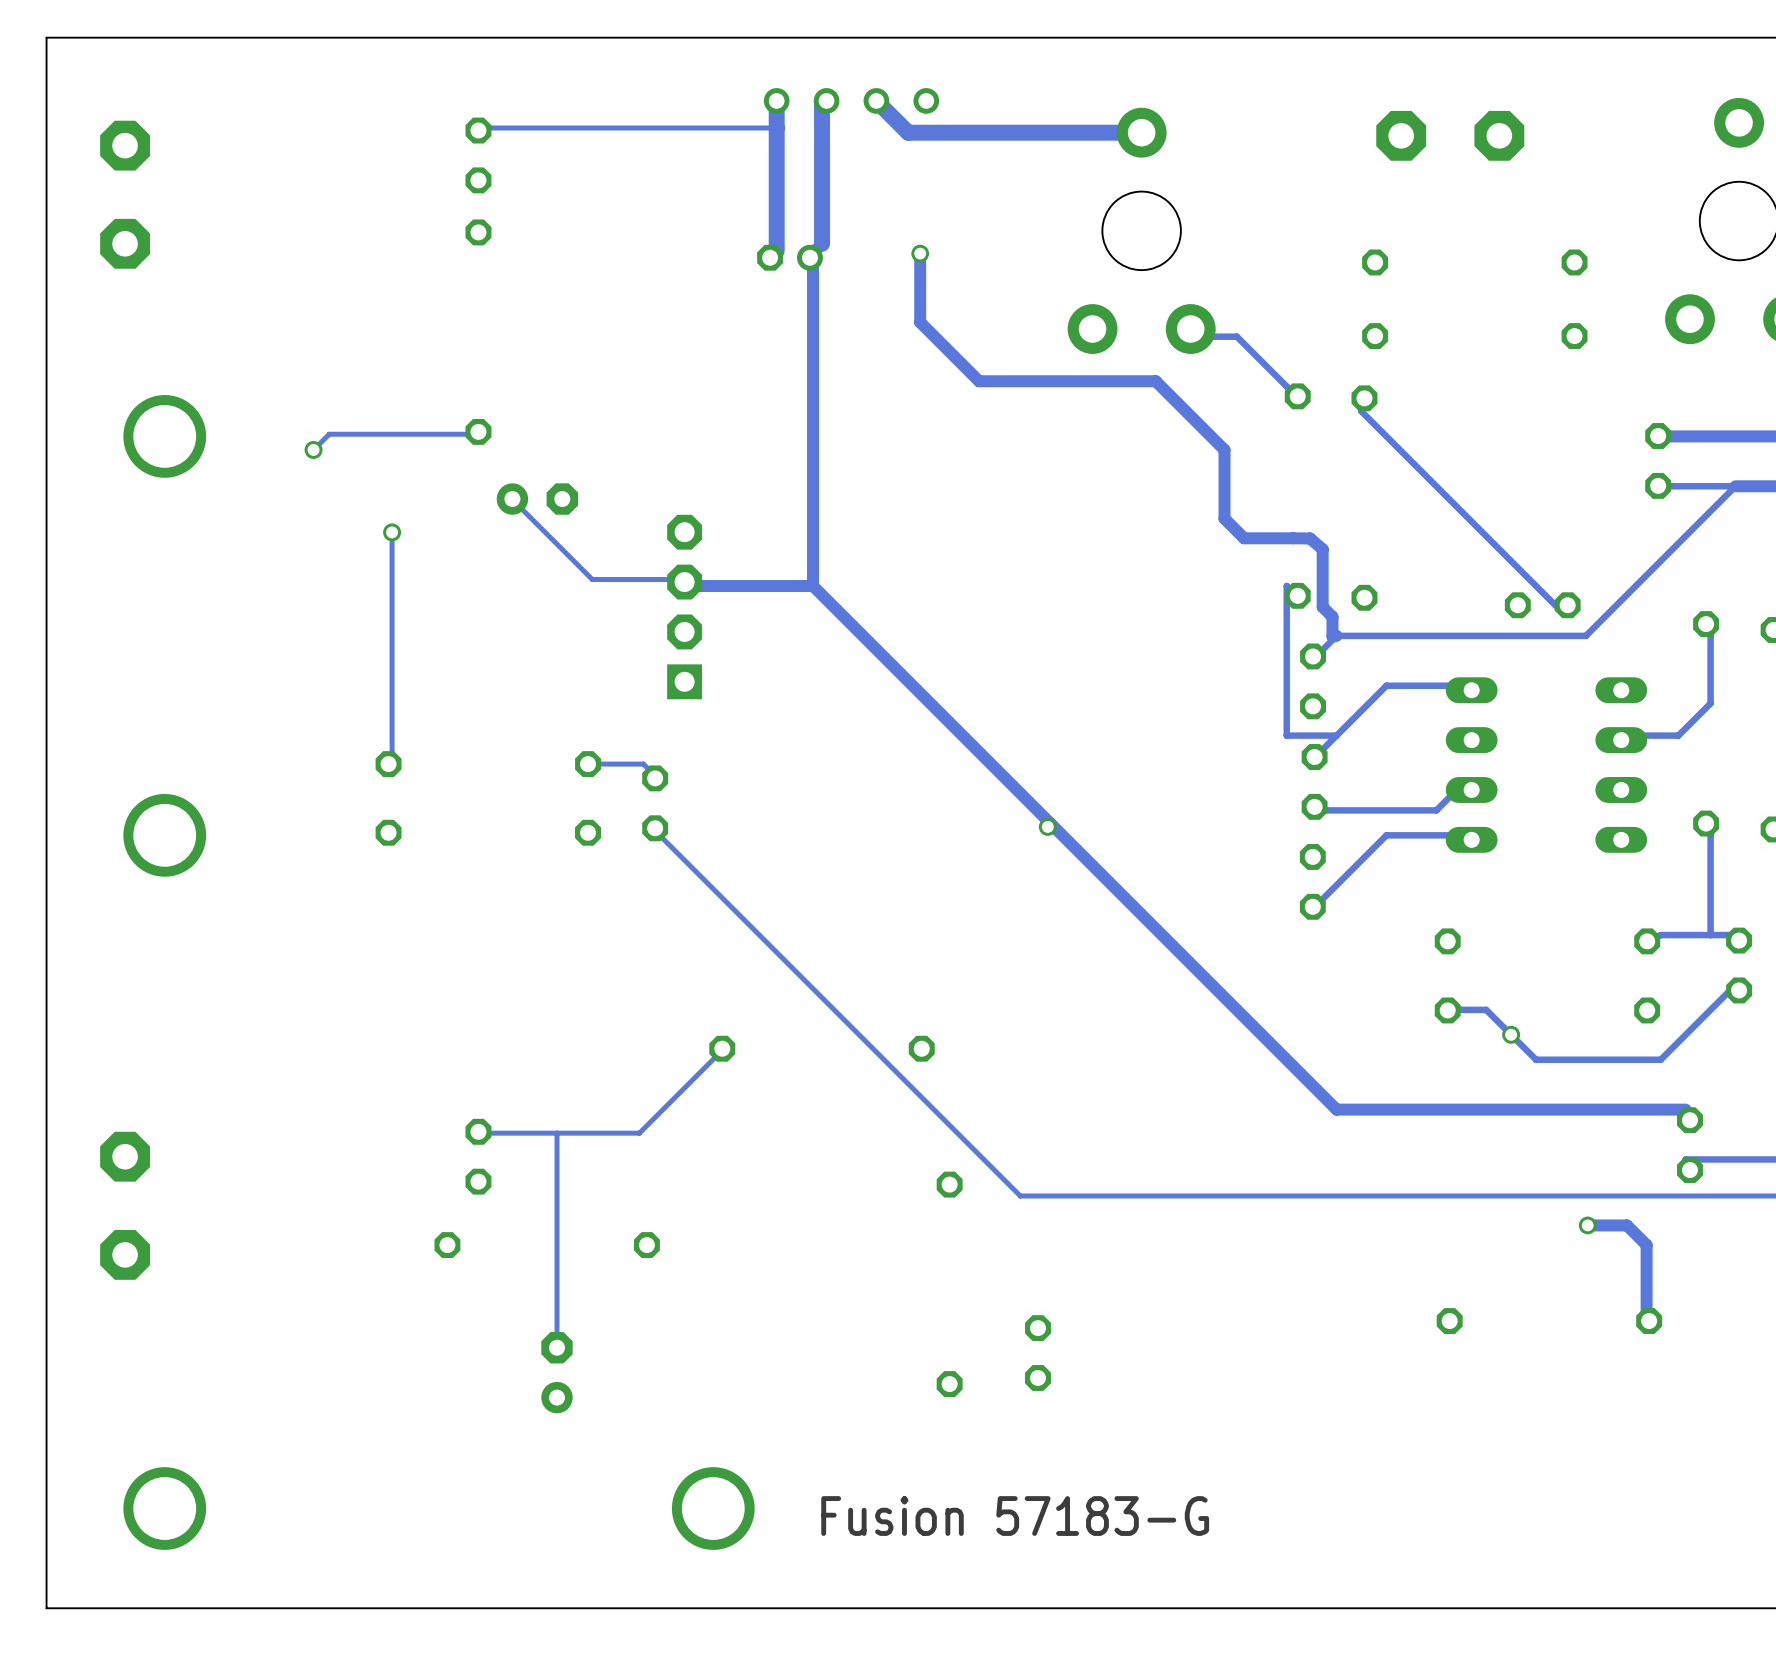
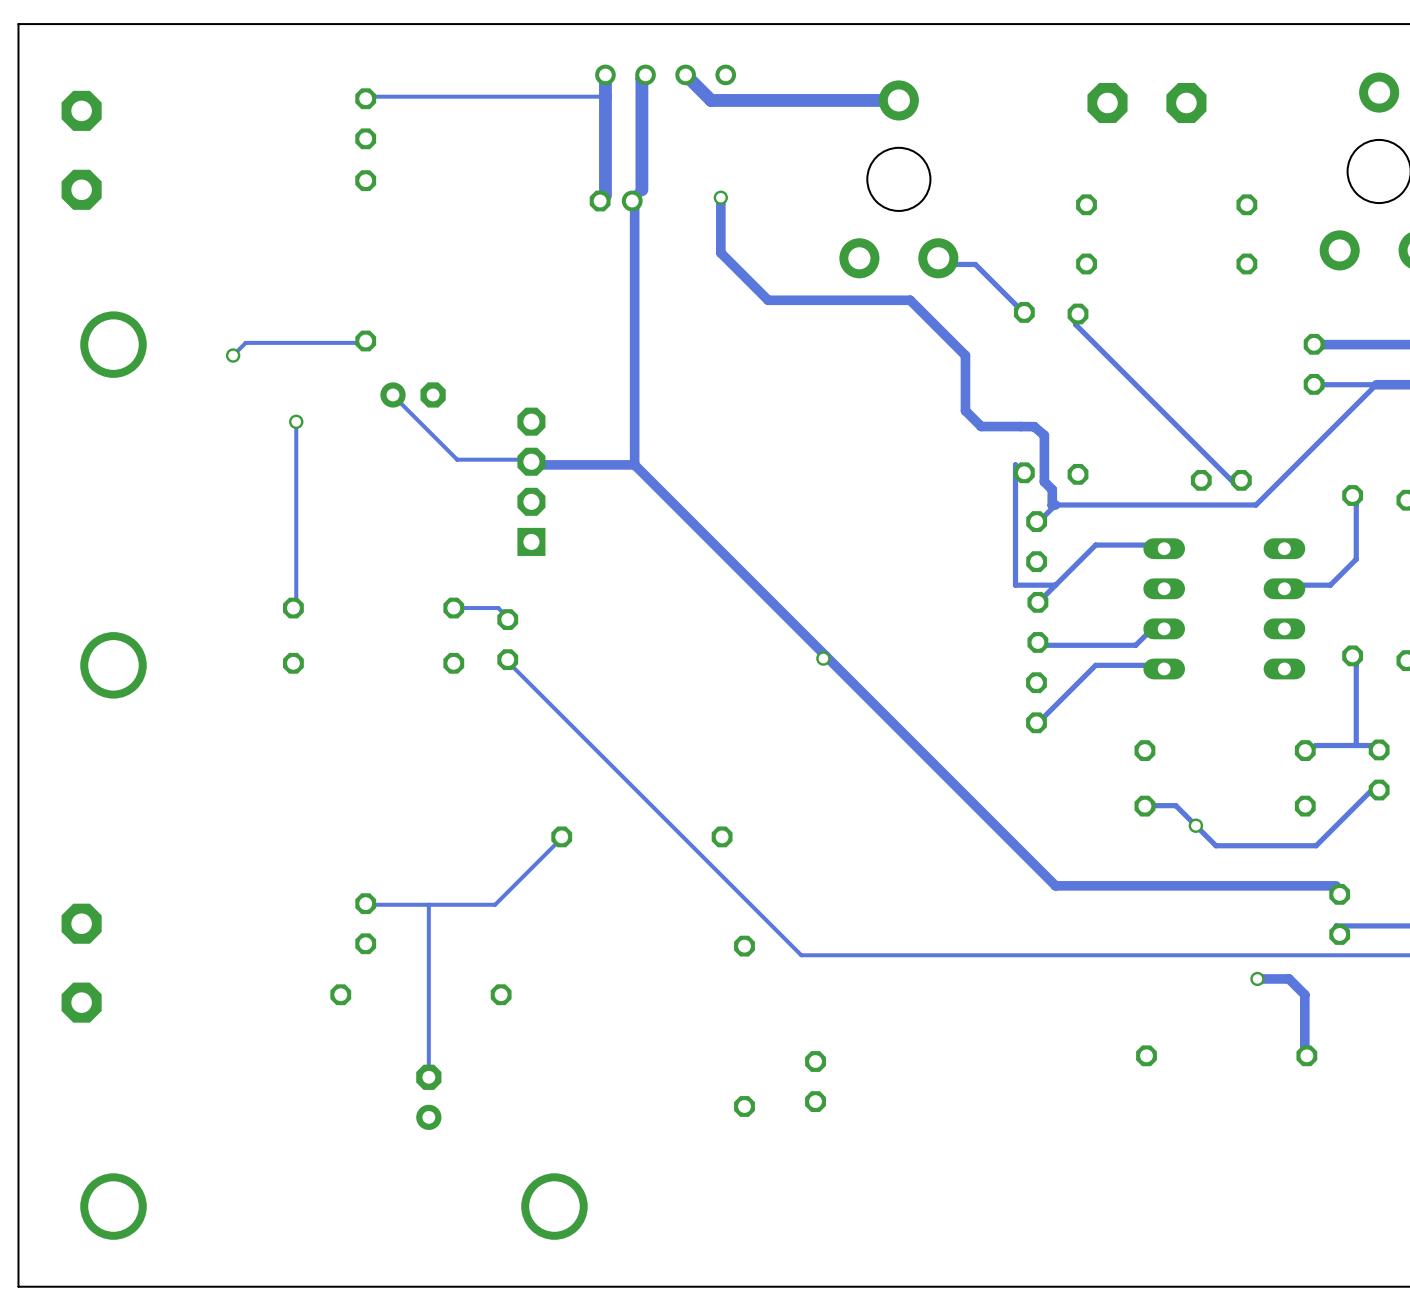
text: Fusion 57183-G (1015, 1516) -> none

